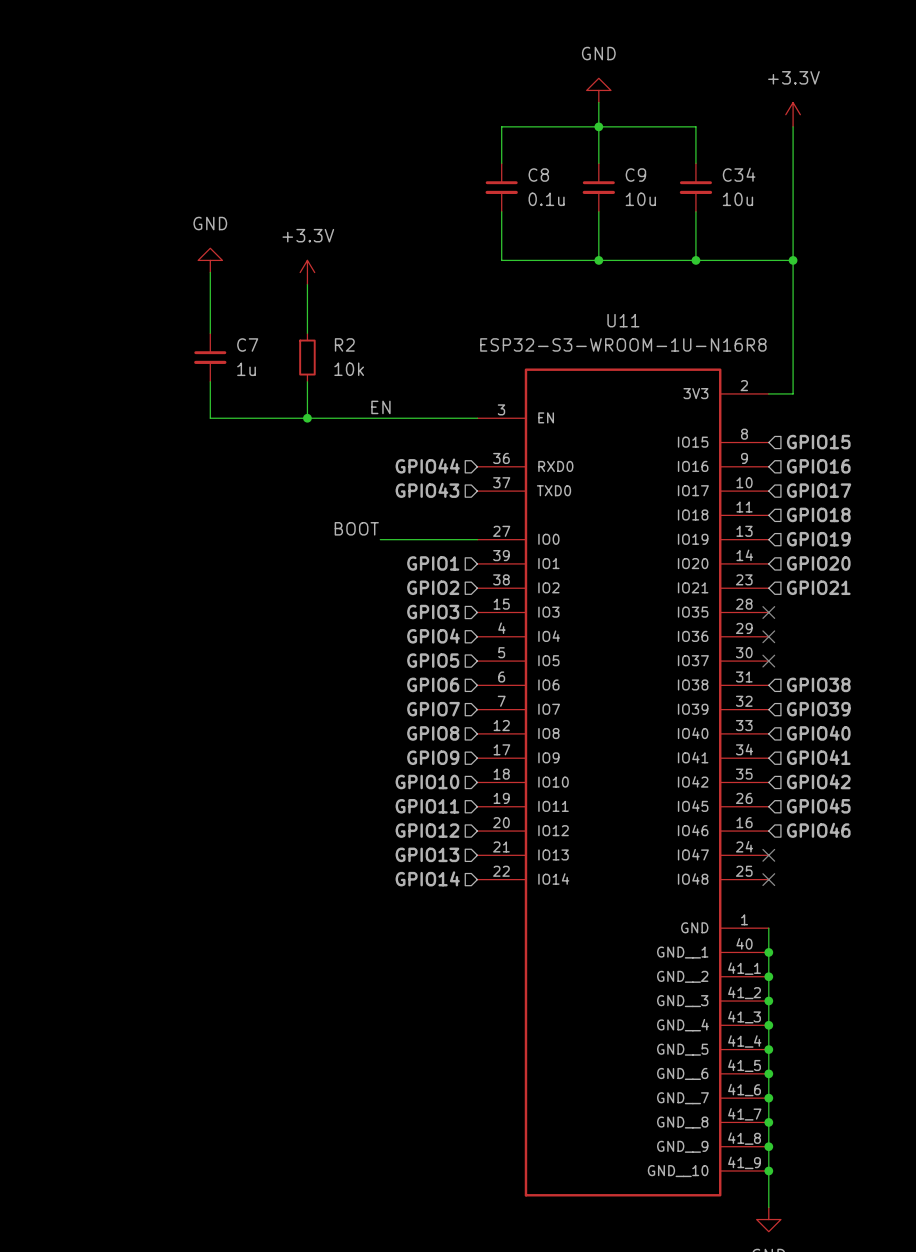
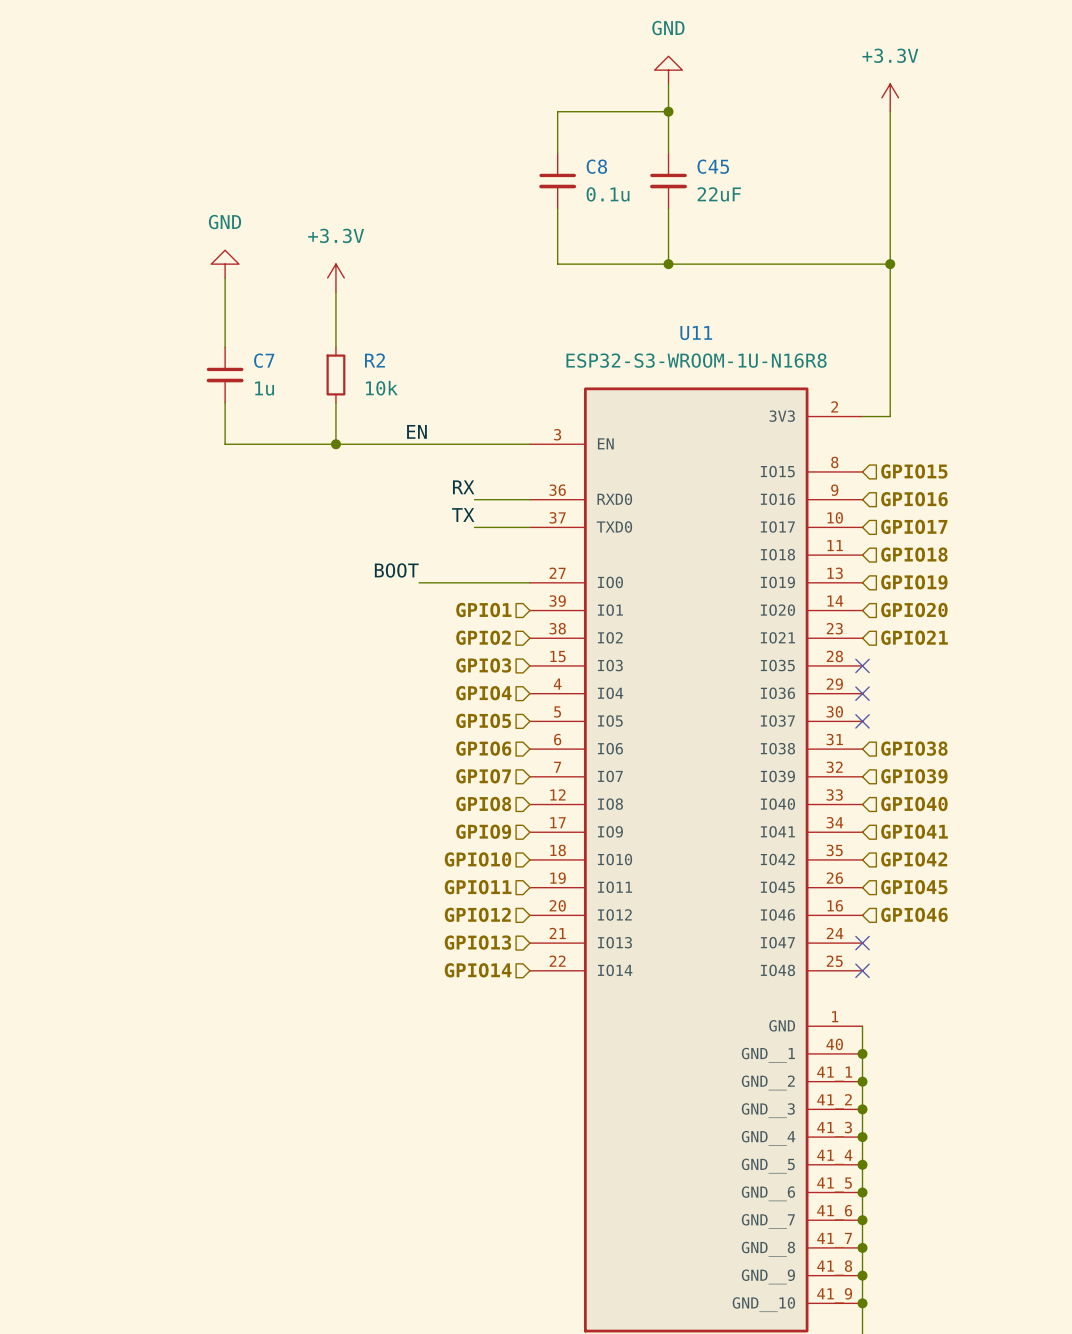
wire: (598, 126) (695, 126) (695, 163) -> none
C9 name: C9 (635, 175) -> C45 (713, 166)
C34: 10u (695, 187) -> none
C9 value: 10u (640, 199) -> 22uF (719, 194)
wire: (695, 211) (695, 260) -> none
junction: (695, 260) -> none
label: none -> RX (463, 487)
hierarchical label: GPIO44 (427, 466) -> none
wire: none -> (474, 499) (529, 499)
label: none -> TX (463, 515)
hierarchical label: GPIO43 (427, 490) -> none
wire: none -> (474, 527) (529, 527)

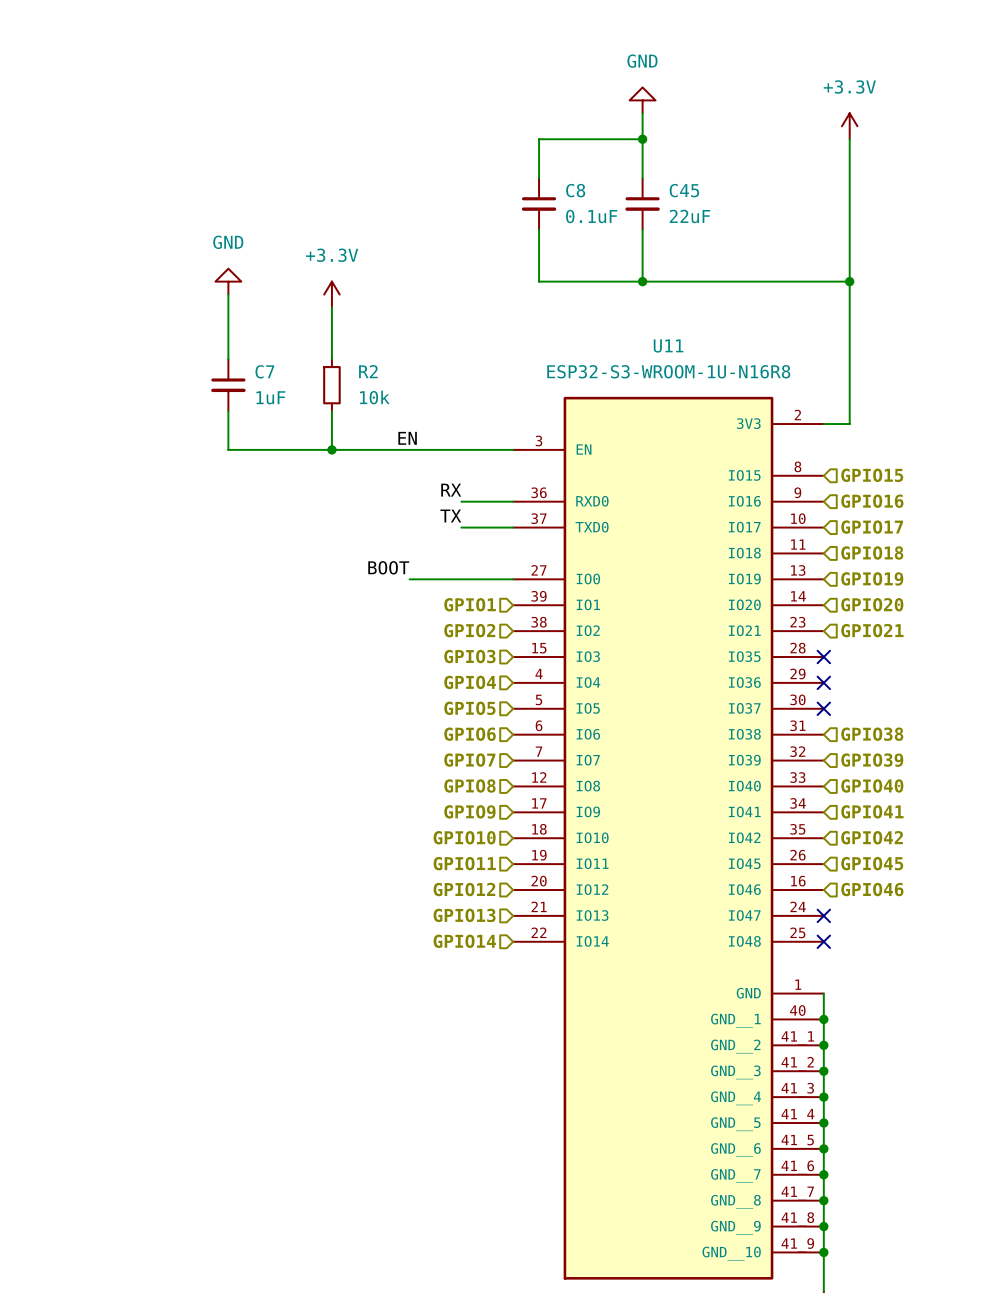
C8 value: 0.1u (608, 194) -> 0.1uF (591, 216)
C7 value: 1u (264, 388) -> 1uF (270, 397)

